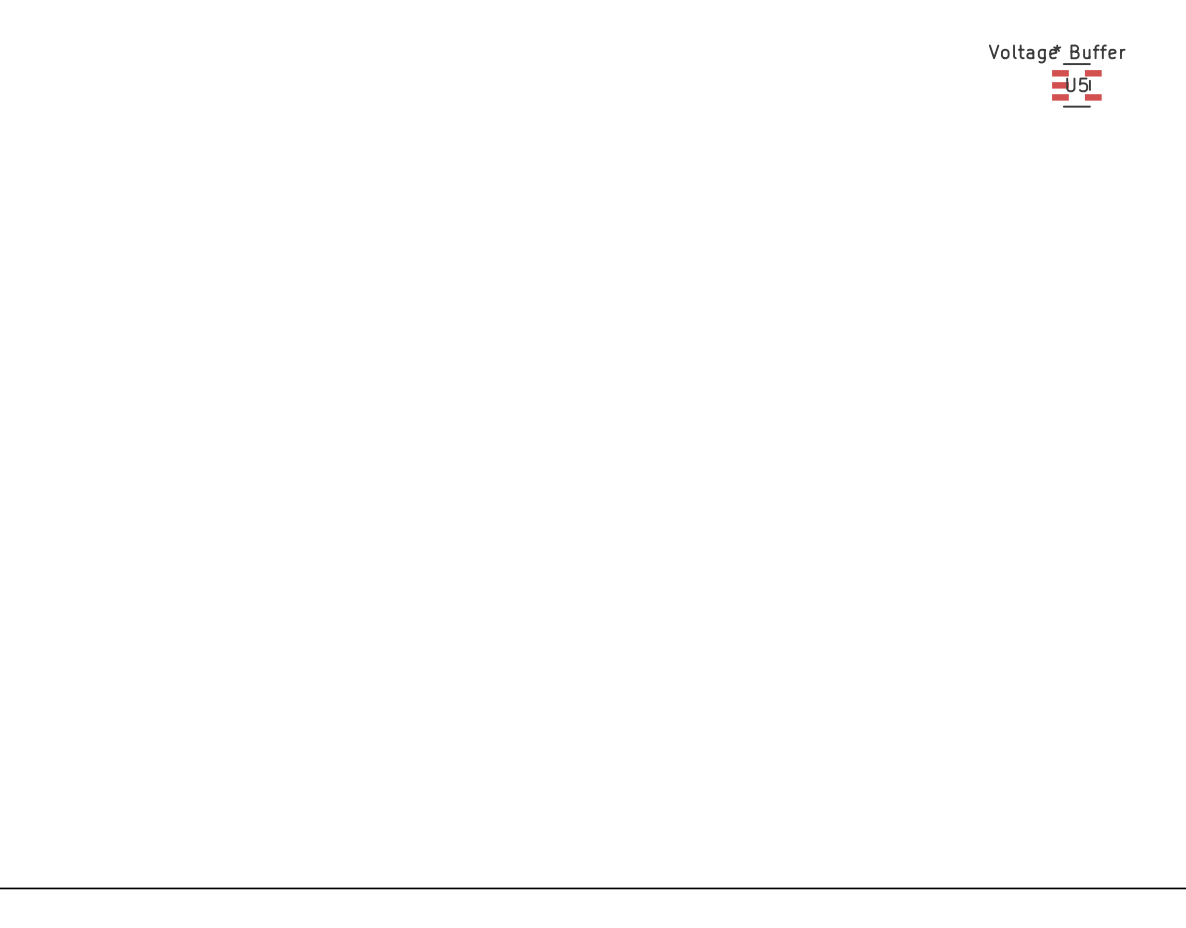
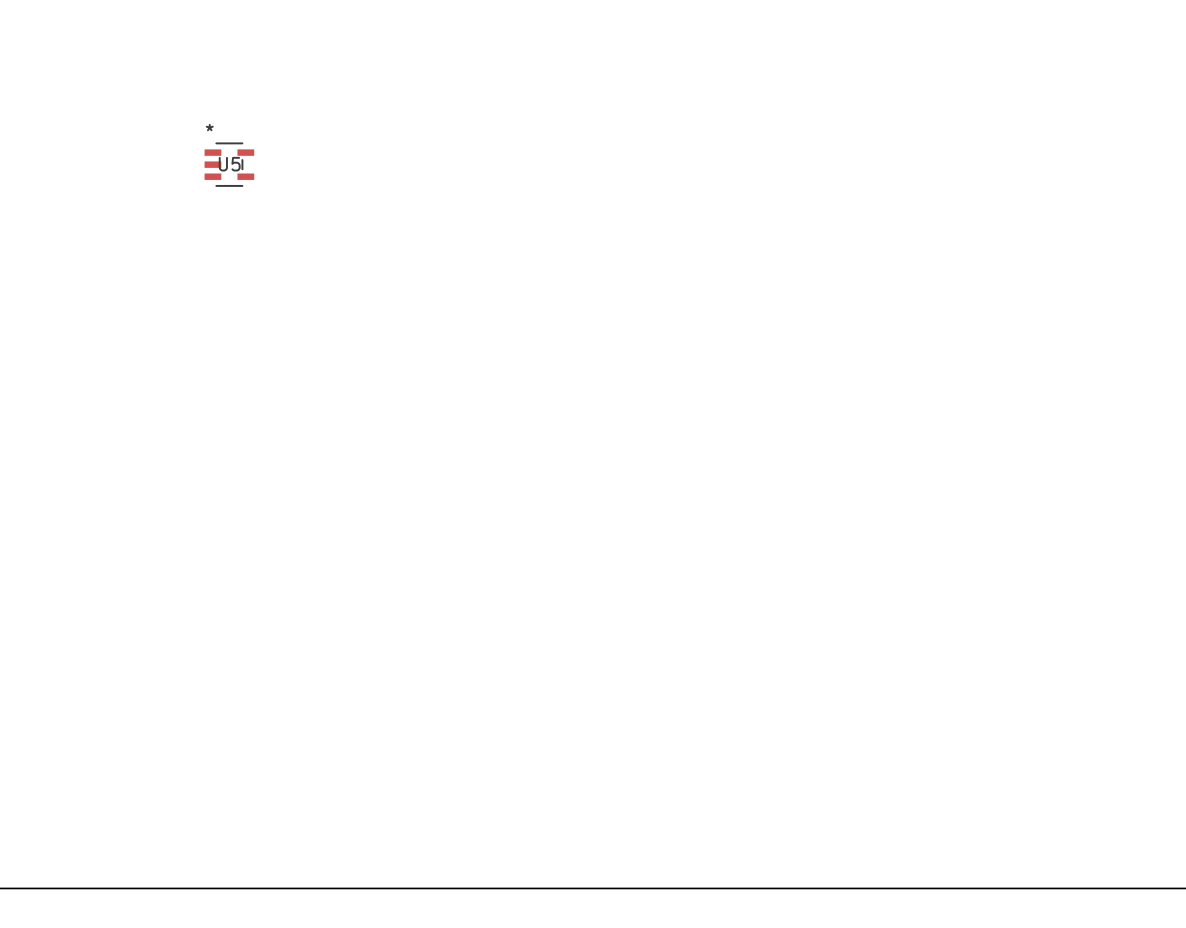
U5 footprint: [1052, 63, 1102, 108] -> [204, 142, 255, 187]

